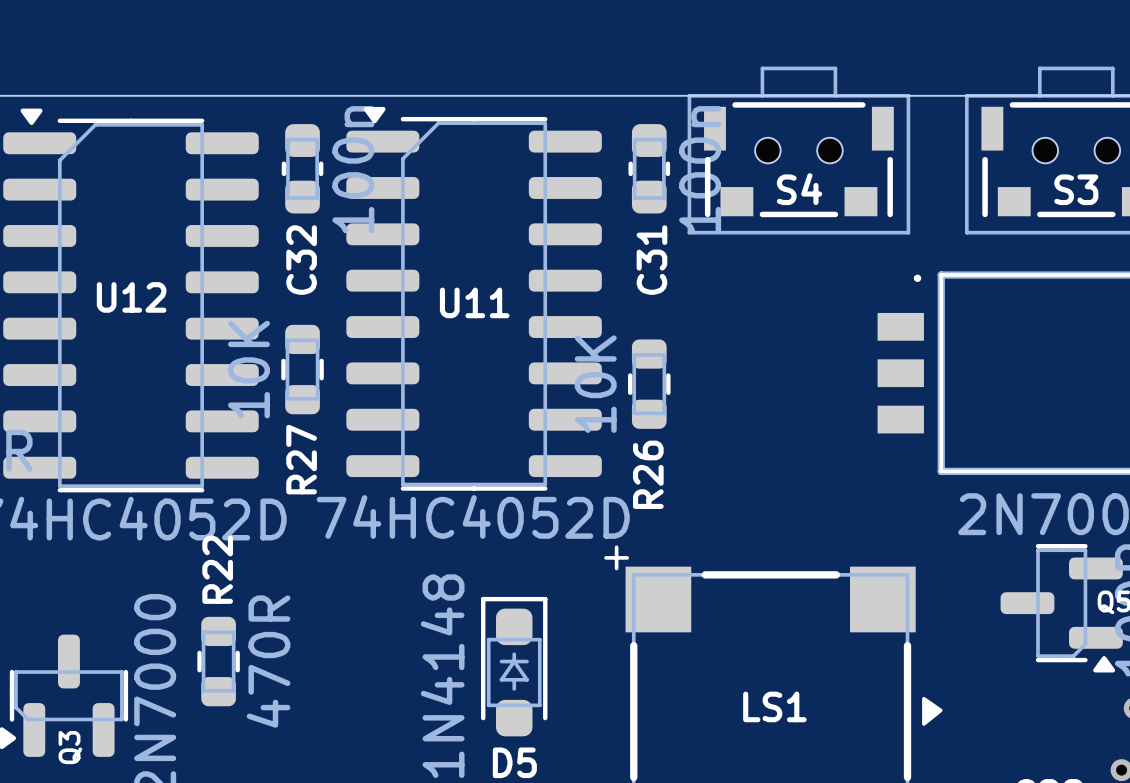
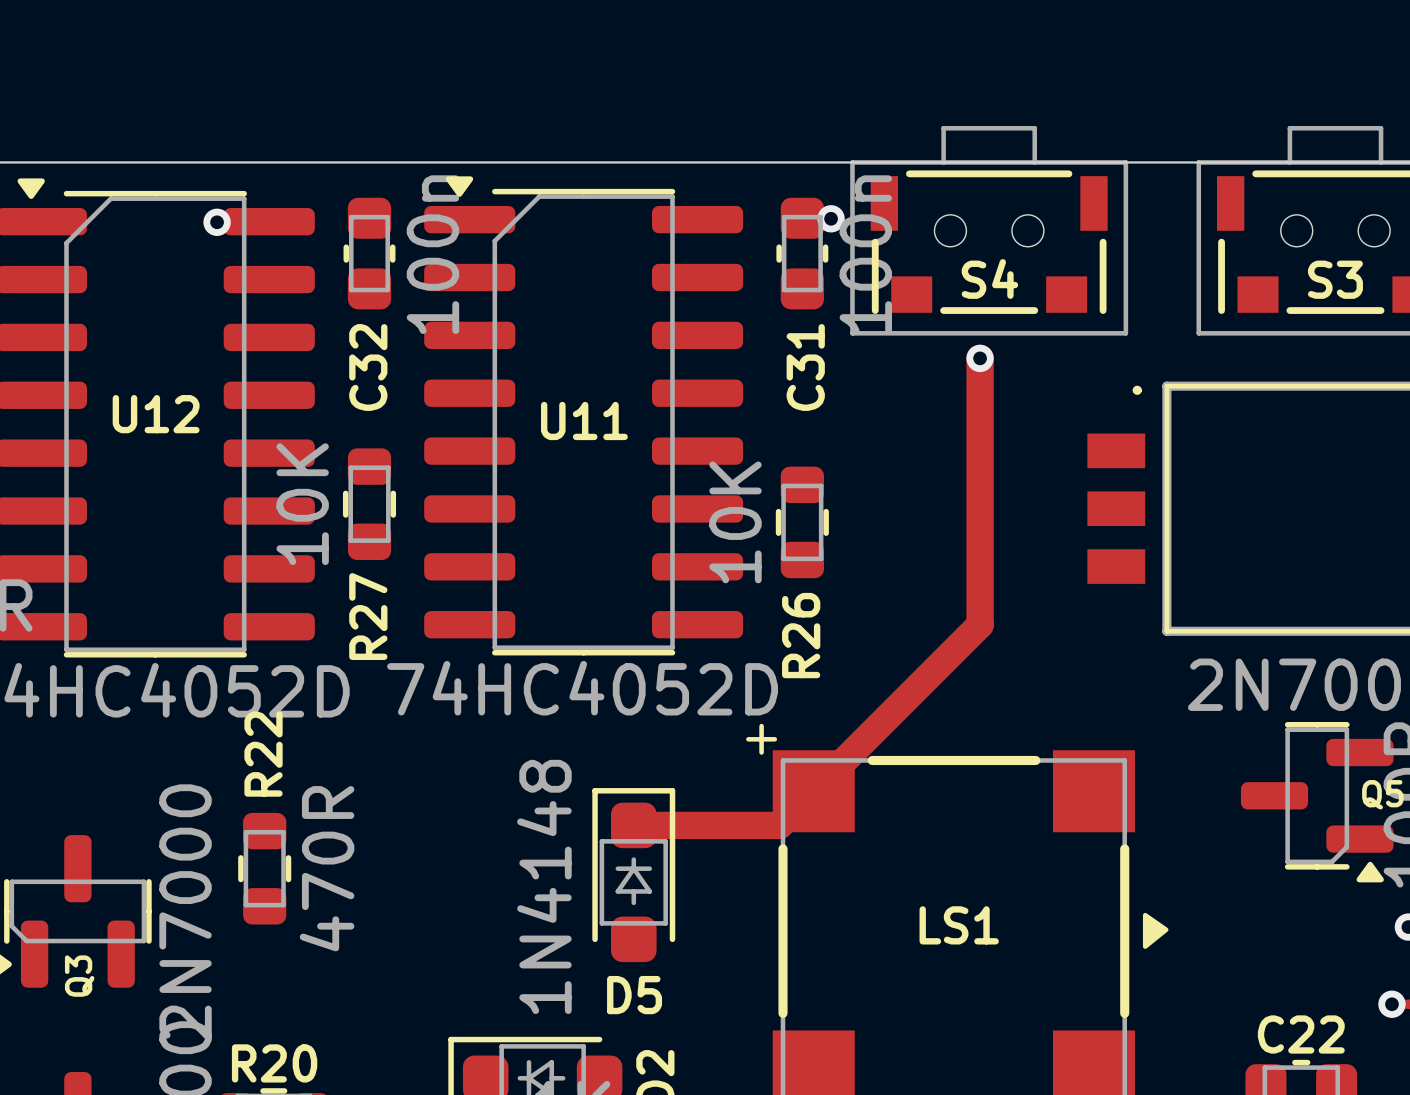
via: none -> (831, 218)
via: none -> (217, 222)
track: none -> (980, 358) (980, 624) (779, 825) (633, 825)
via: none -> (980, 358)

